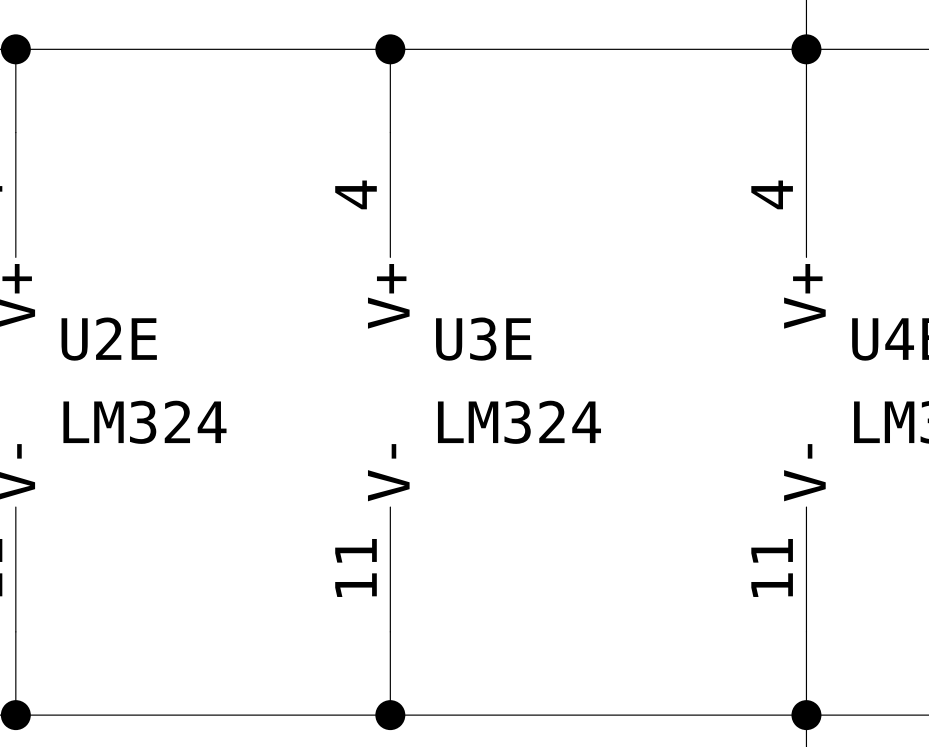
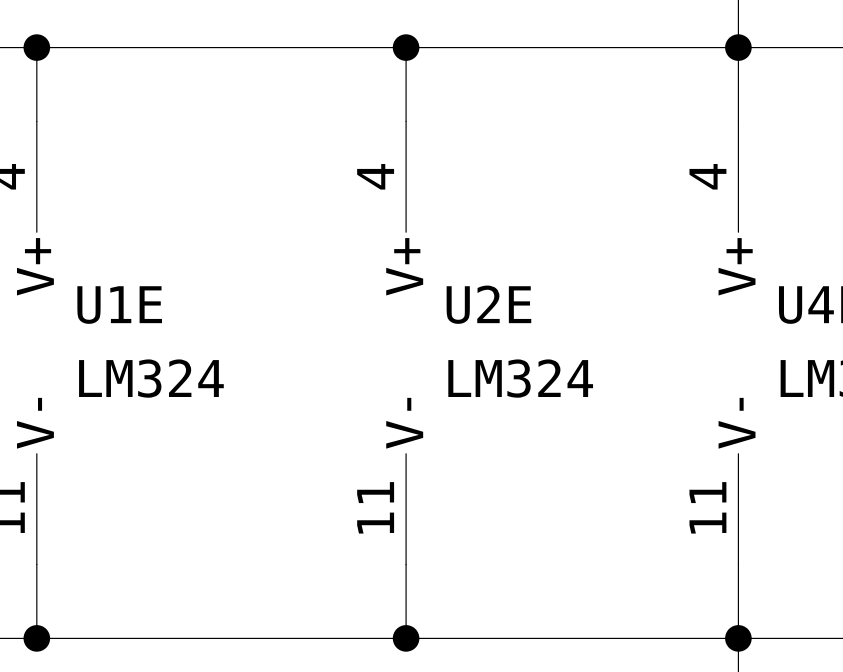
wire: (390, 49) (390, 132) -> (406, 47) (406, 121)
junction position: (390, 49) -> (406, 47)
U2E name: U2E (109, 339) -> U1E (119, 305)
U3E: LM324 (390, 382) -> none
U2E: none -> LM324 (406, 342)
wire: (390, 631) (390, 715) -> (406, 564) (406, 638)
junction position: (390, 715) -> (406, 638)

